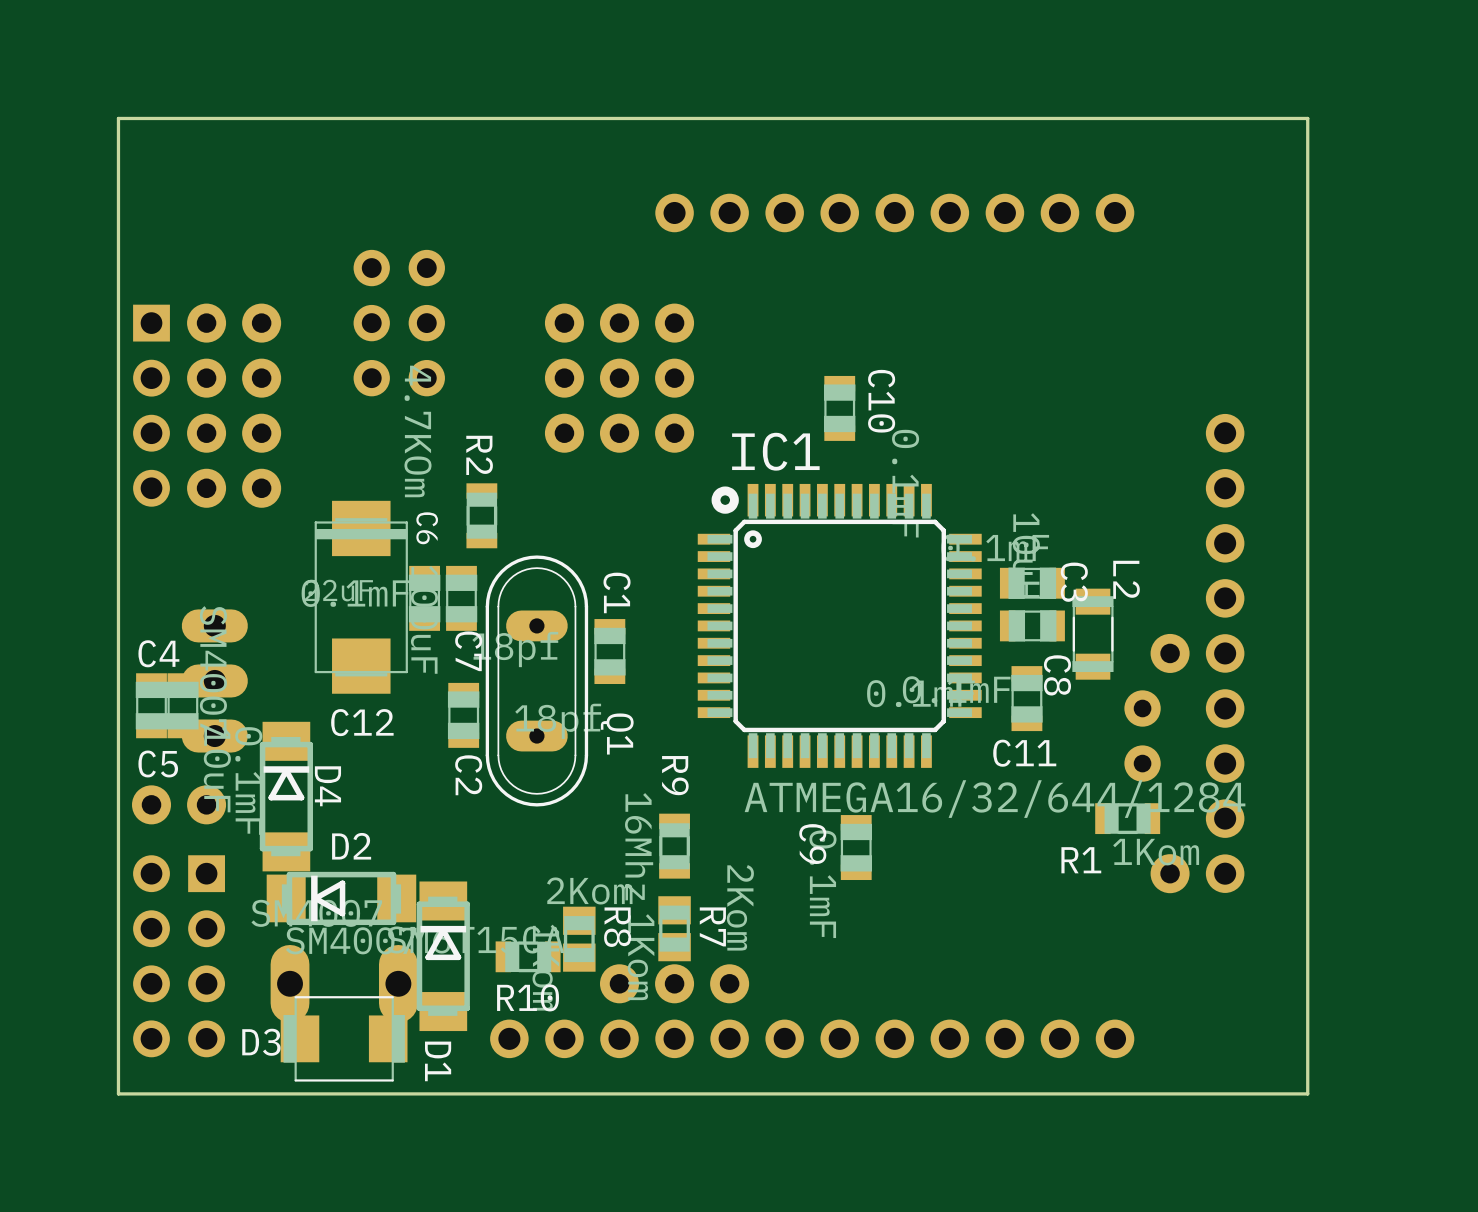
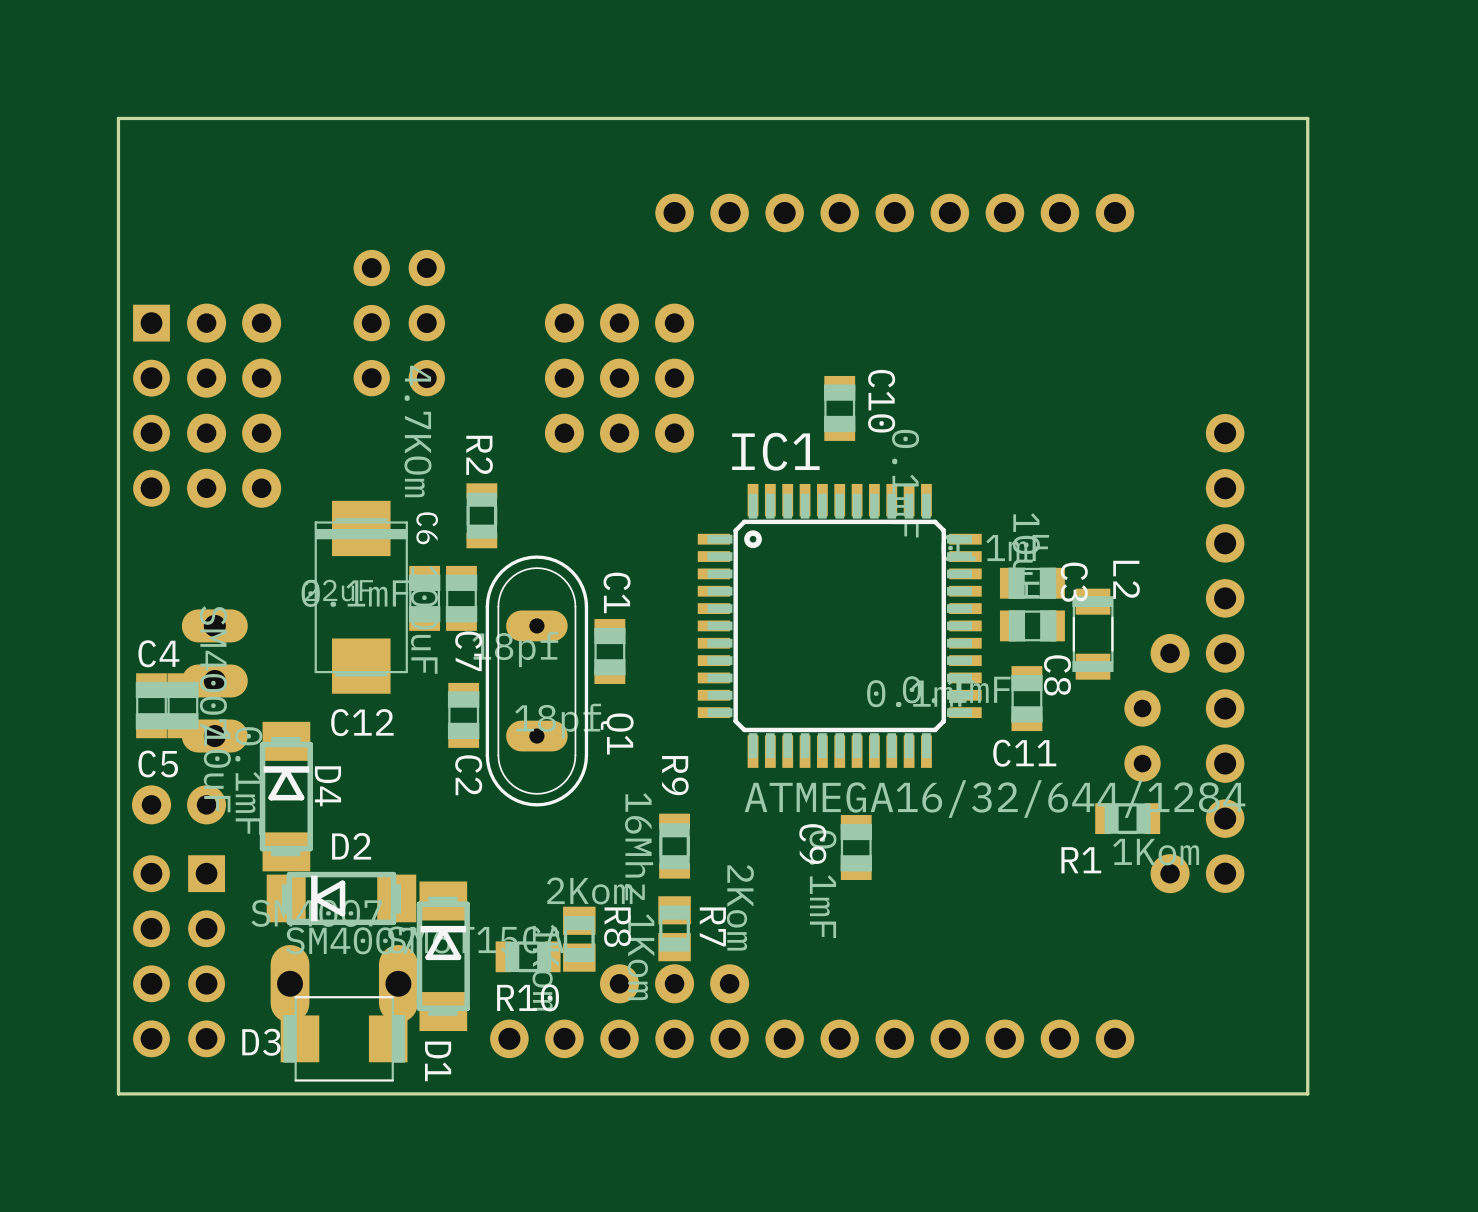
drawing: [711, 486, 739, 514] -> none

